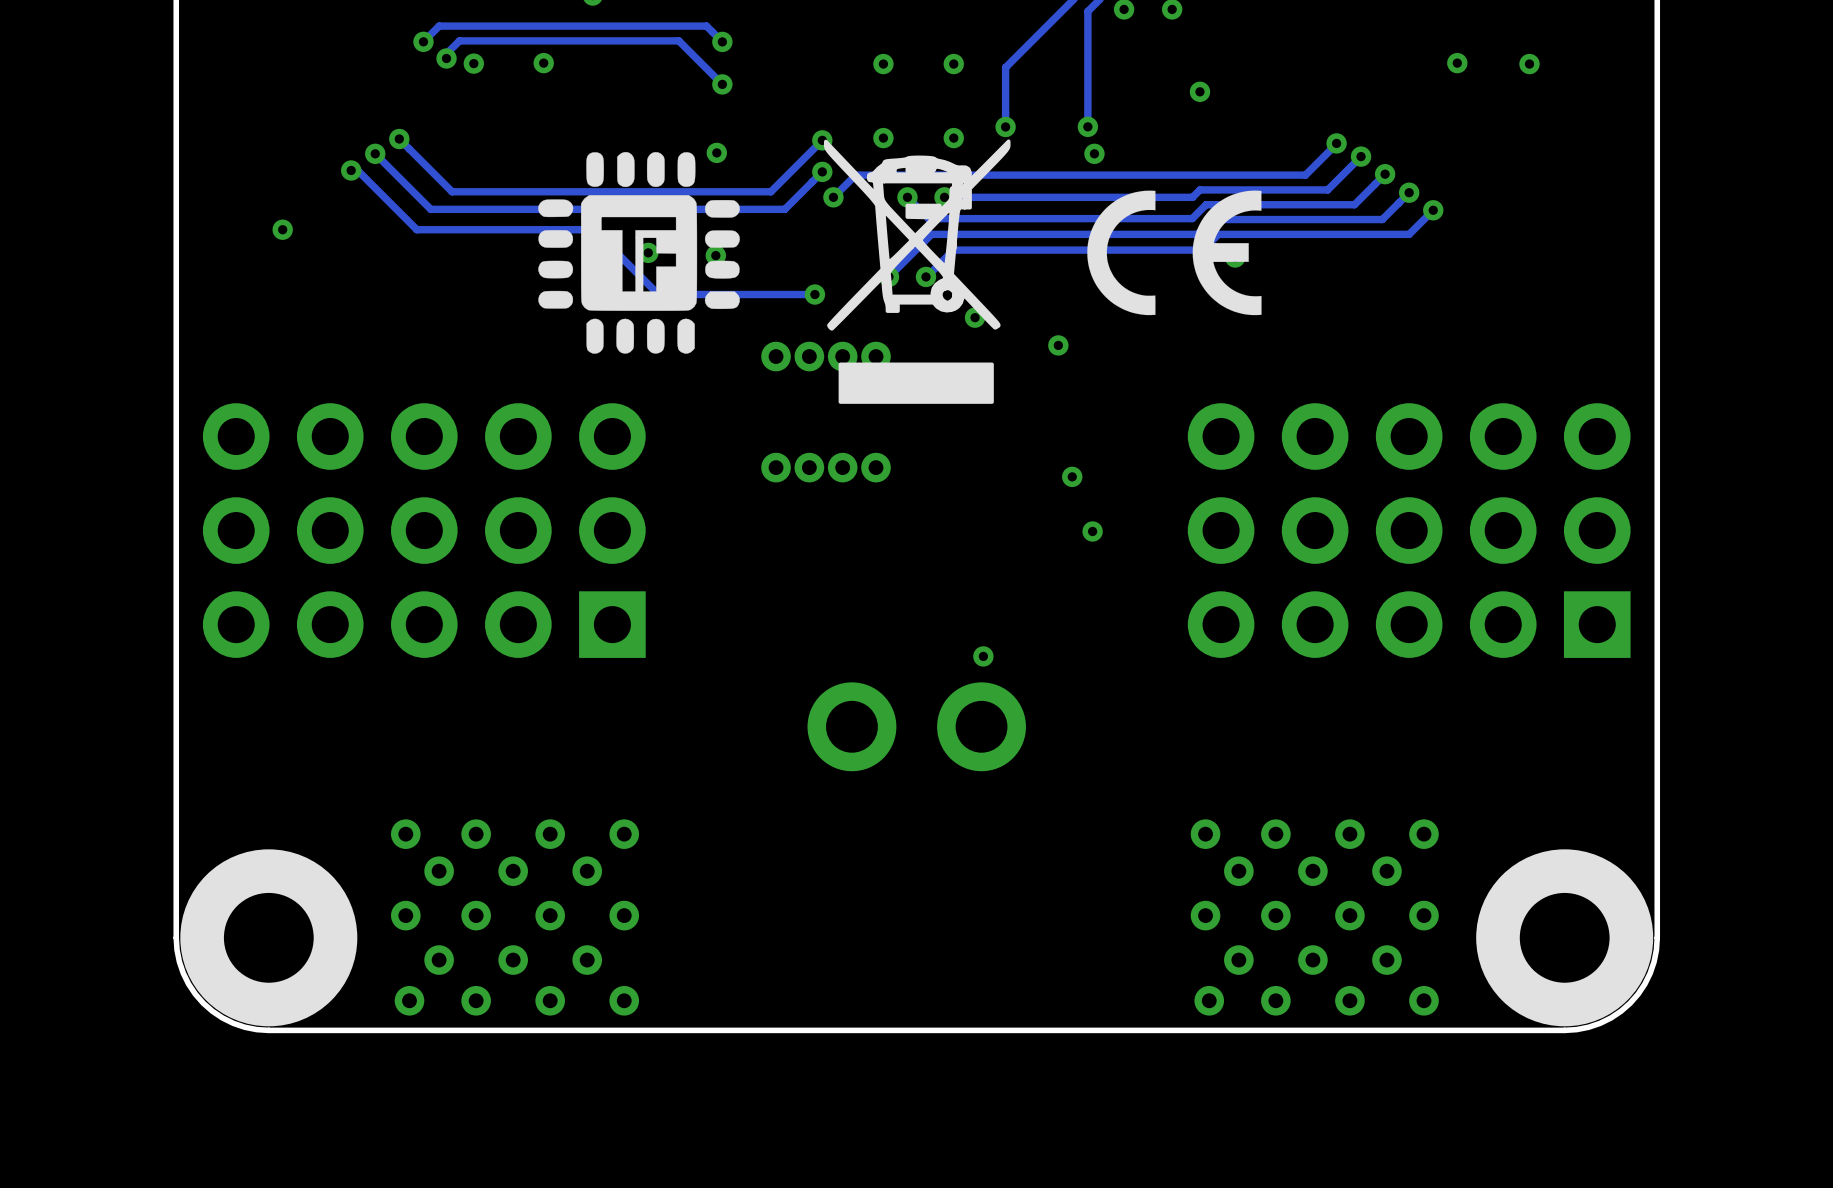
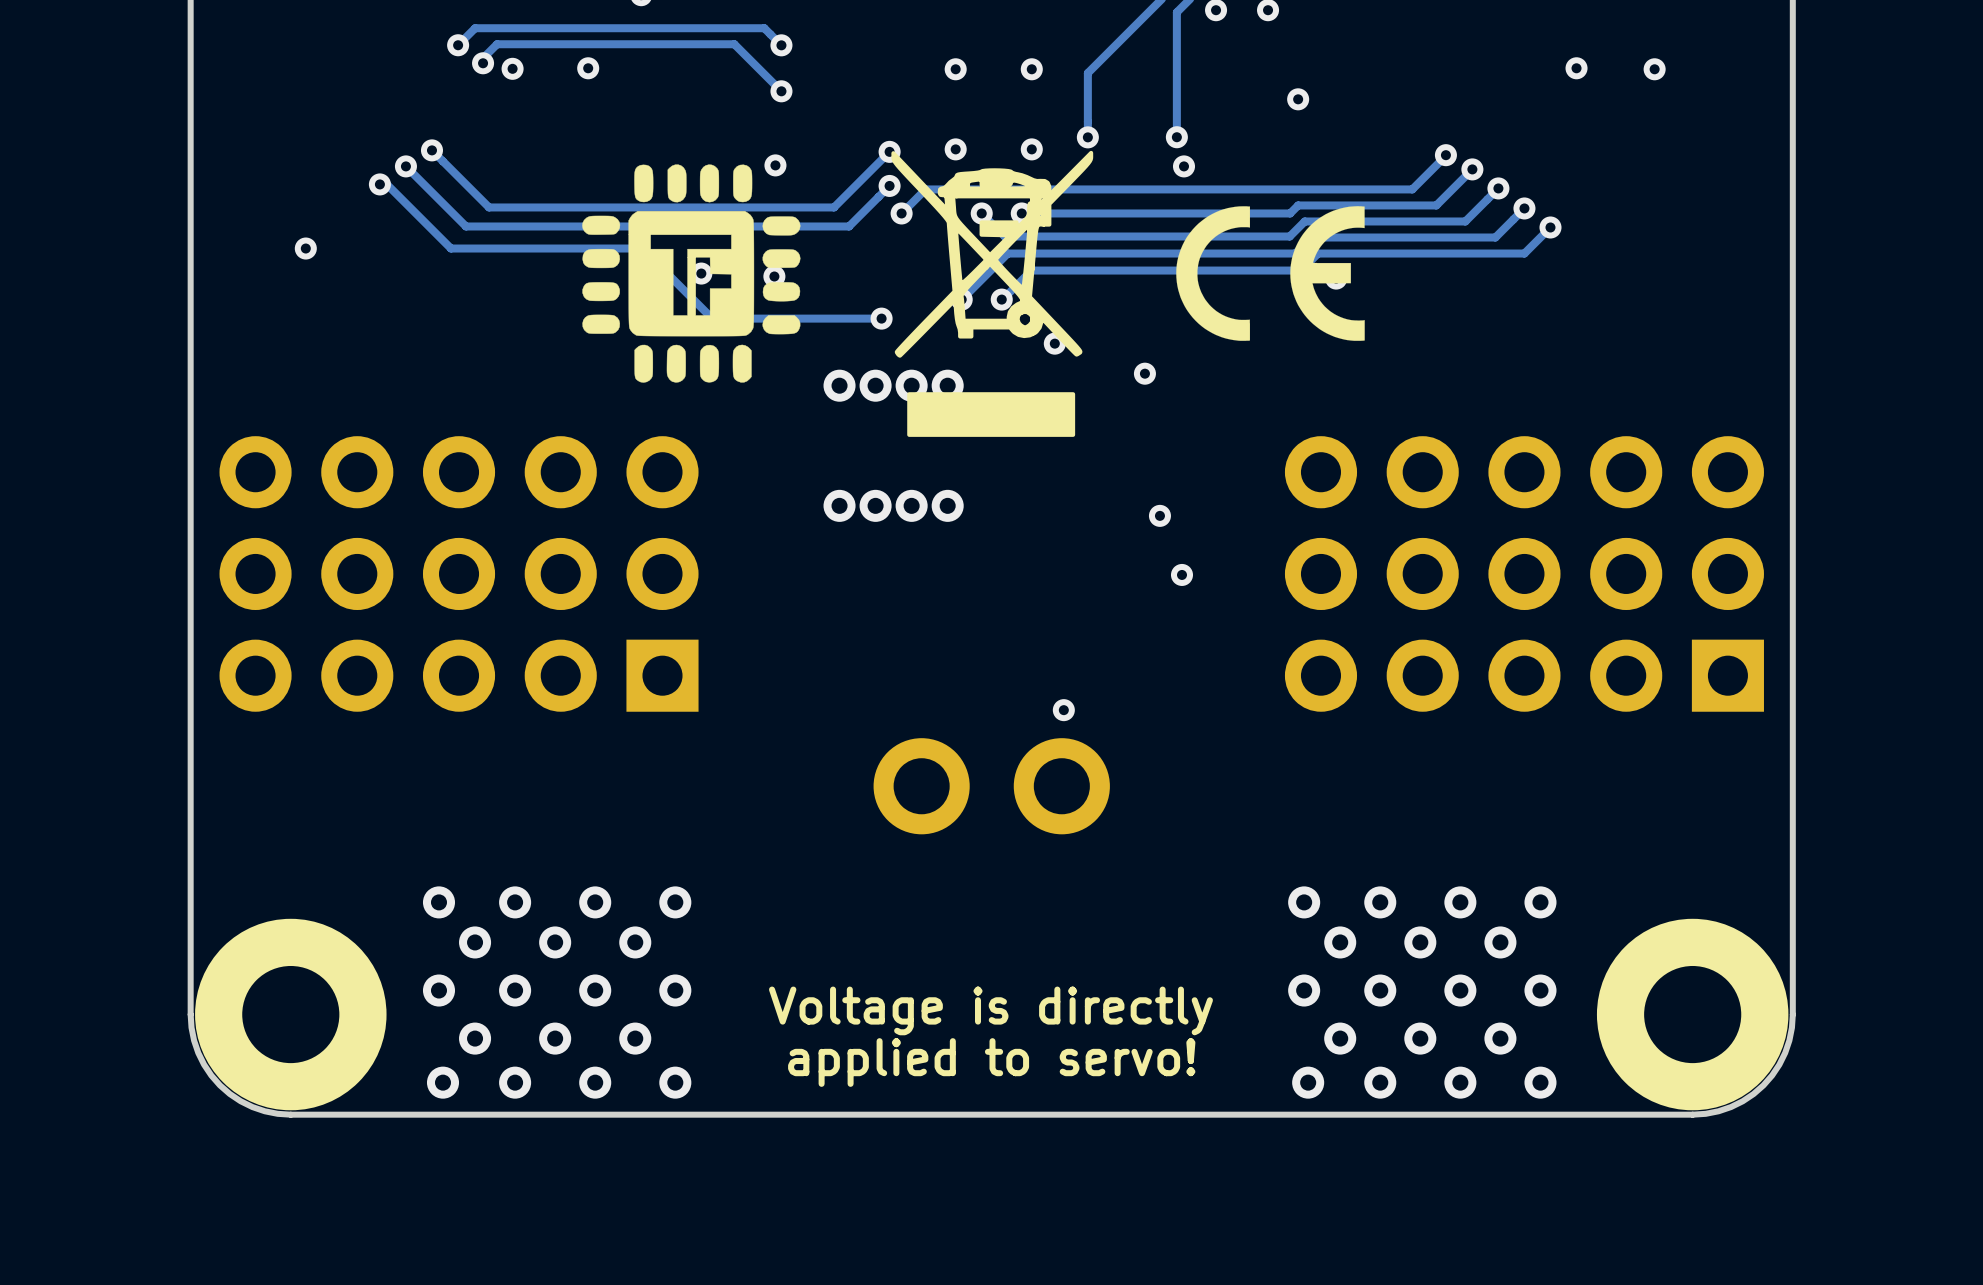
text: none -> Voltage is directly (990, 1010)
text: none -> applied to servo! (991, 1062)

